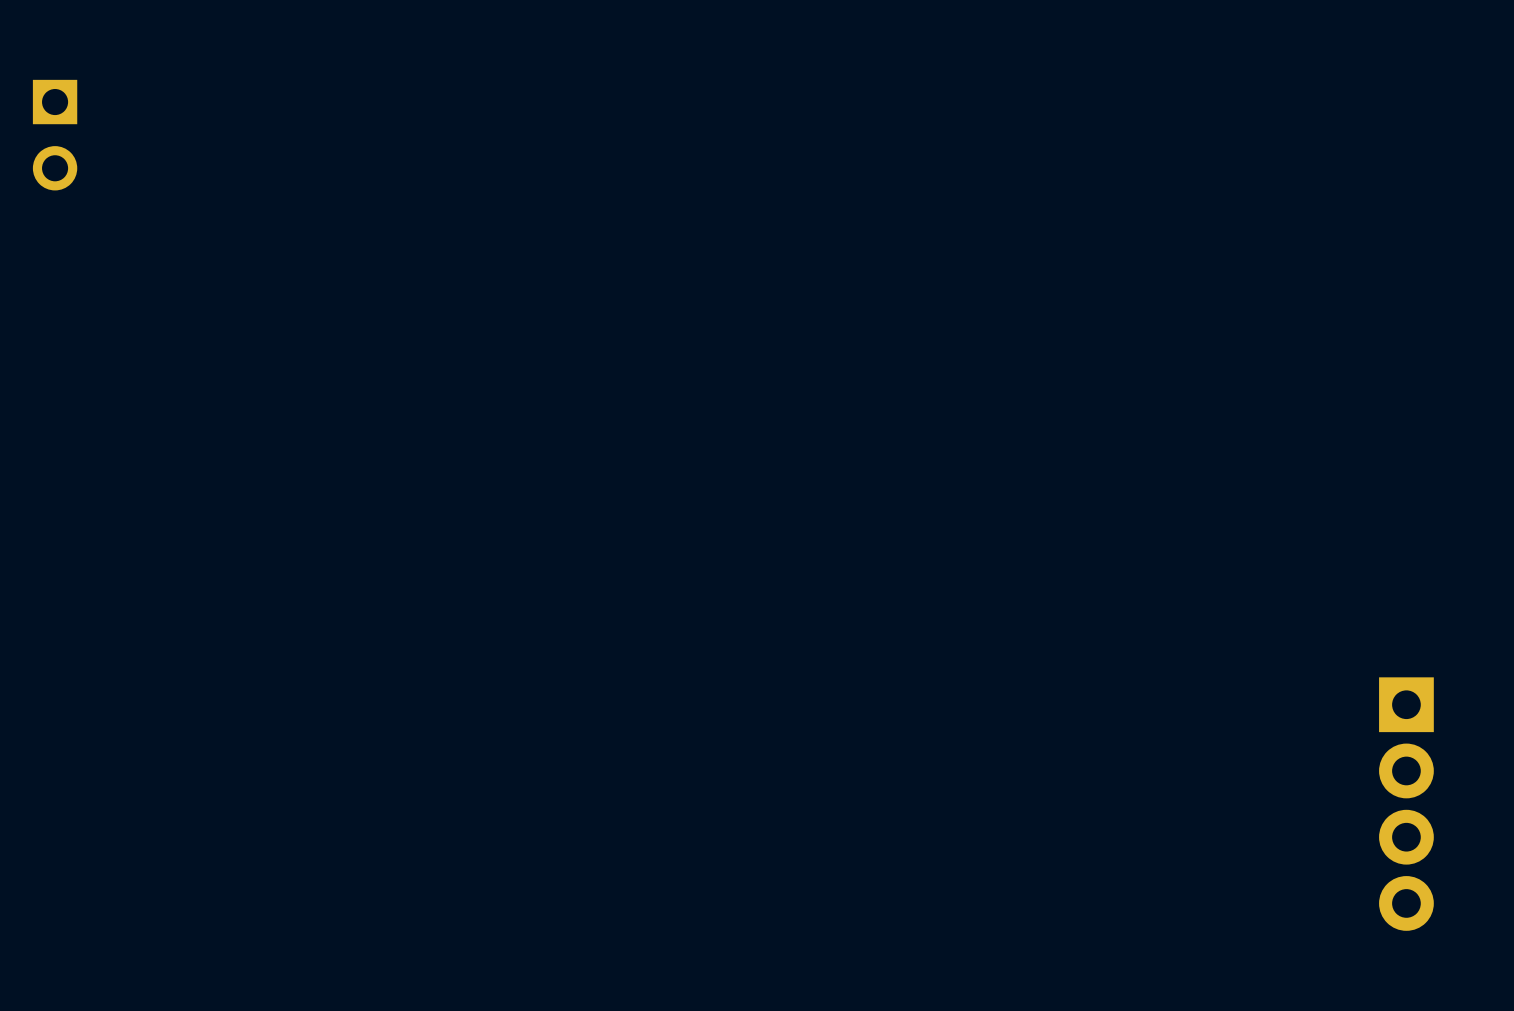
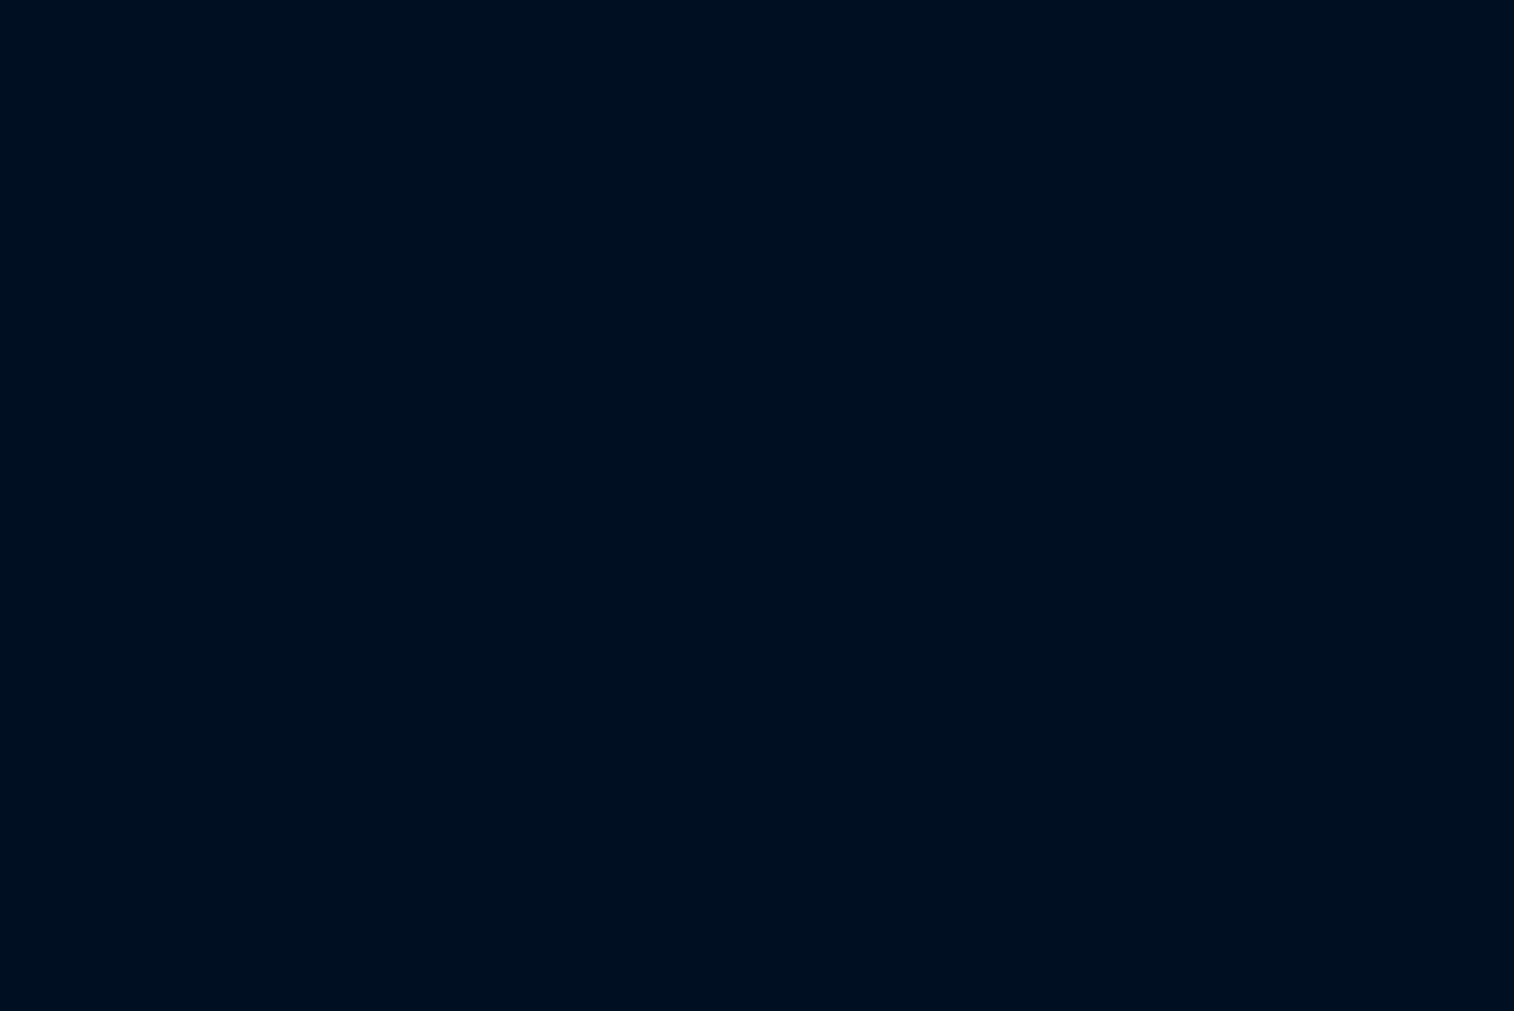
part: (55, 135) -> none
part: (1406, 804) -> none

